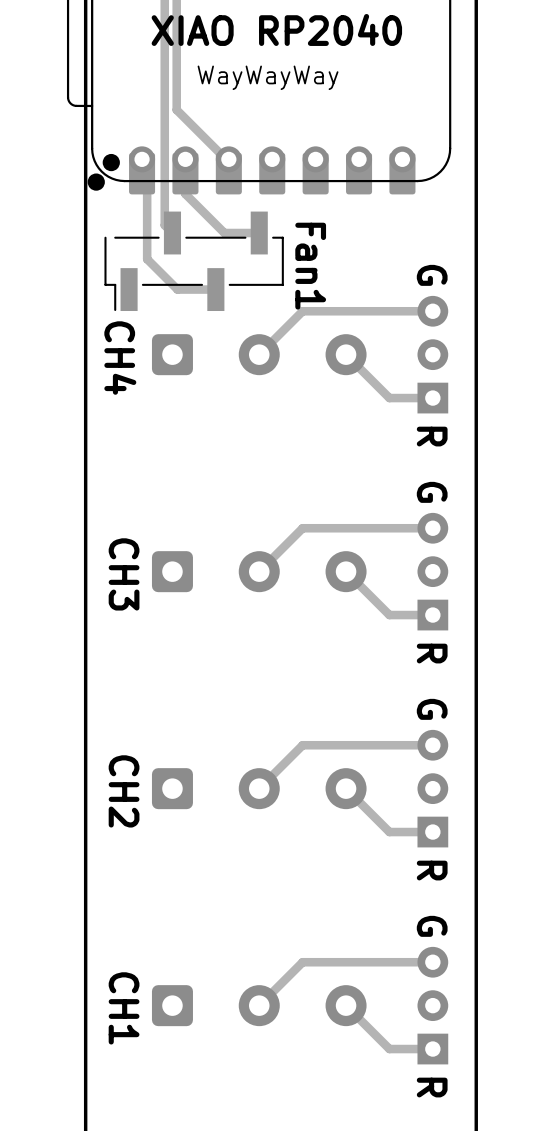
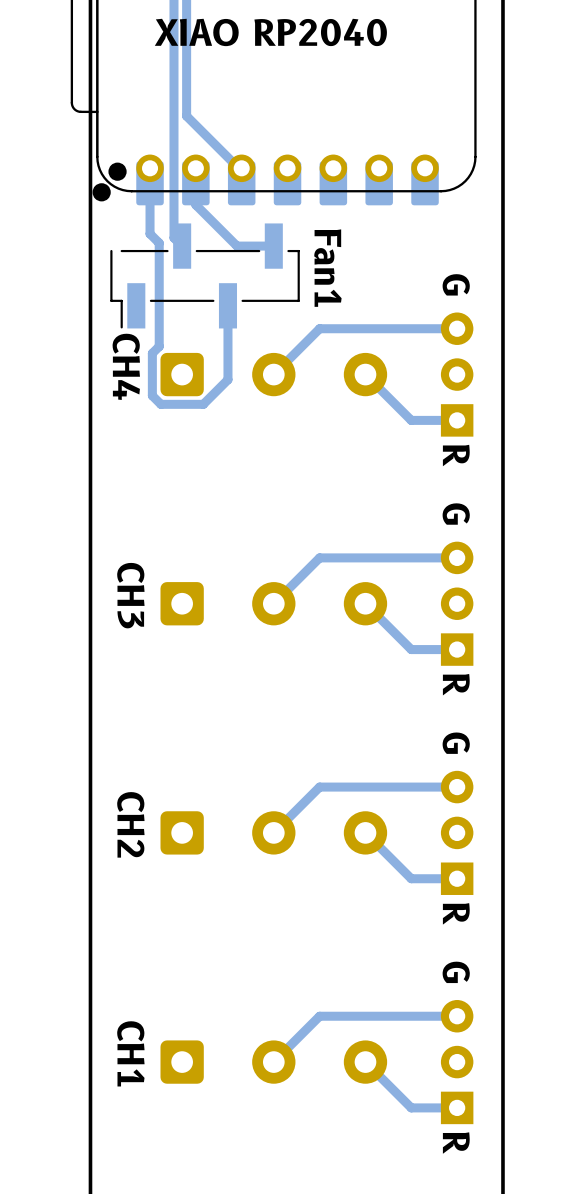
text: WayWayWay (268, 77) -> none
track: (147, 178) (147, 259) (177, 289) (215, 289) -> (150, 171) (150, 233) (159, 243) (159, 346) (152, 353) (152, 395) (160, 404) (203, 404) (227, 379) (227, 305)

